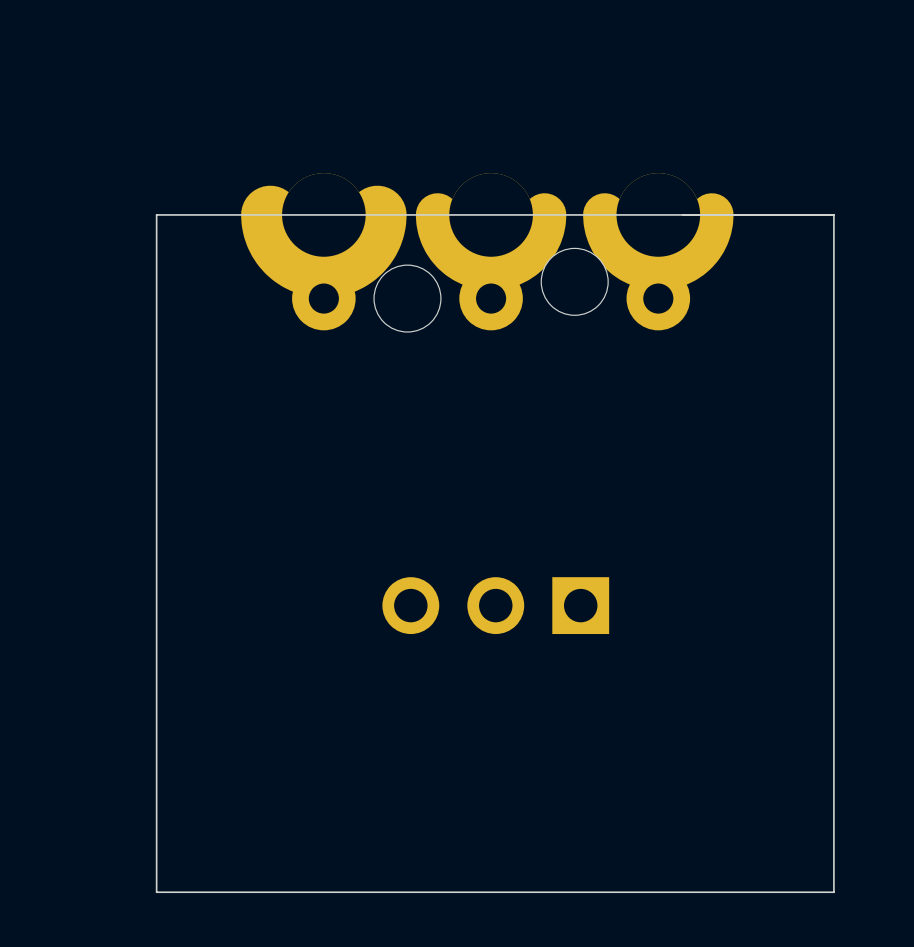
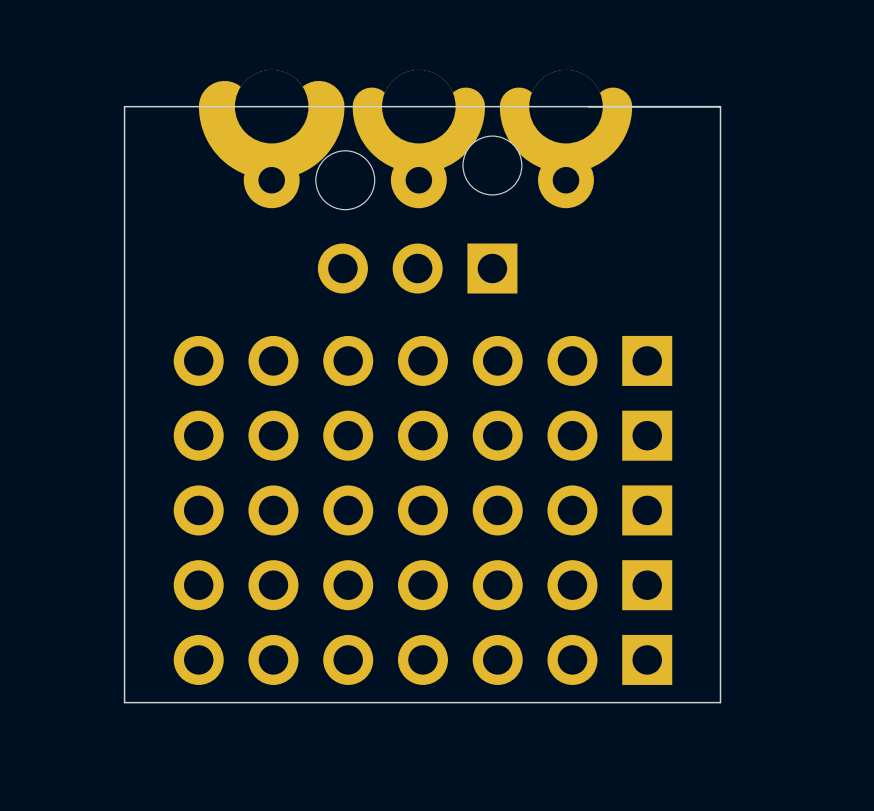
part: none -> (417, 268)
part: none -> (422, 360)
part footprint: [382, 577, 610, 635] -> [173, 410, 673, 461]
part: none -> (422, 510)
part: none -> (422, 585)
part: none -> (422, 659)

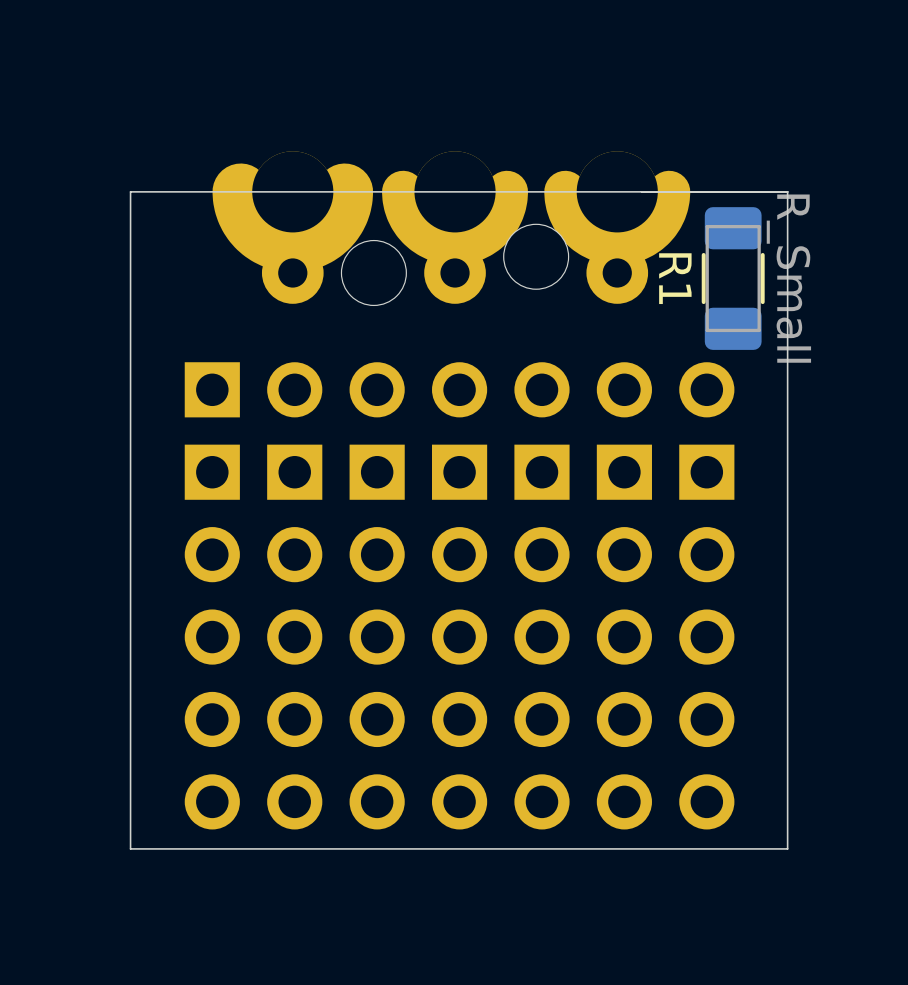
R1: none -> R_Small (733, 278)
part footprint: [317, 243, 518, 294] -> [184, 362, 735, 418]
part: (422, 360) -> none
part: (422, 435) -> none
part footprint: [173, 485, 673, 536] -> [431, 444, 488, 830]
part: none -> (212, 637)
part: none -> (294, 637)
part: none -> (377, 637)
part: none -> (541, 637)
part: none -> (624, 637)
part: none -> (706, 637)
part: (422, 585) -> none
part: (422, 659) -> none

